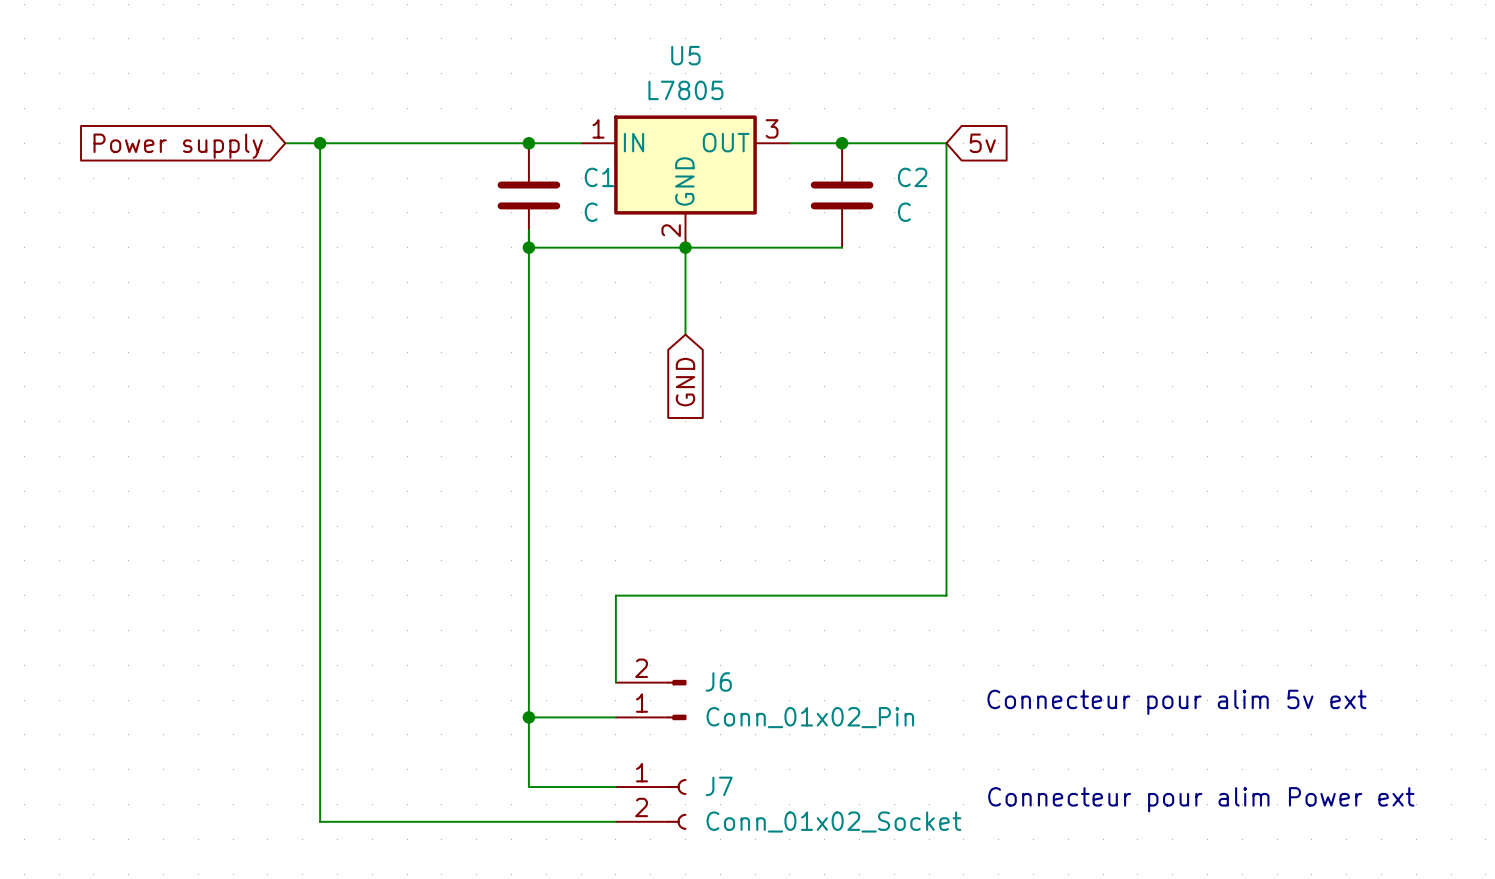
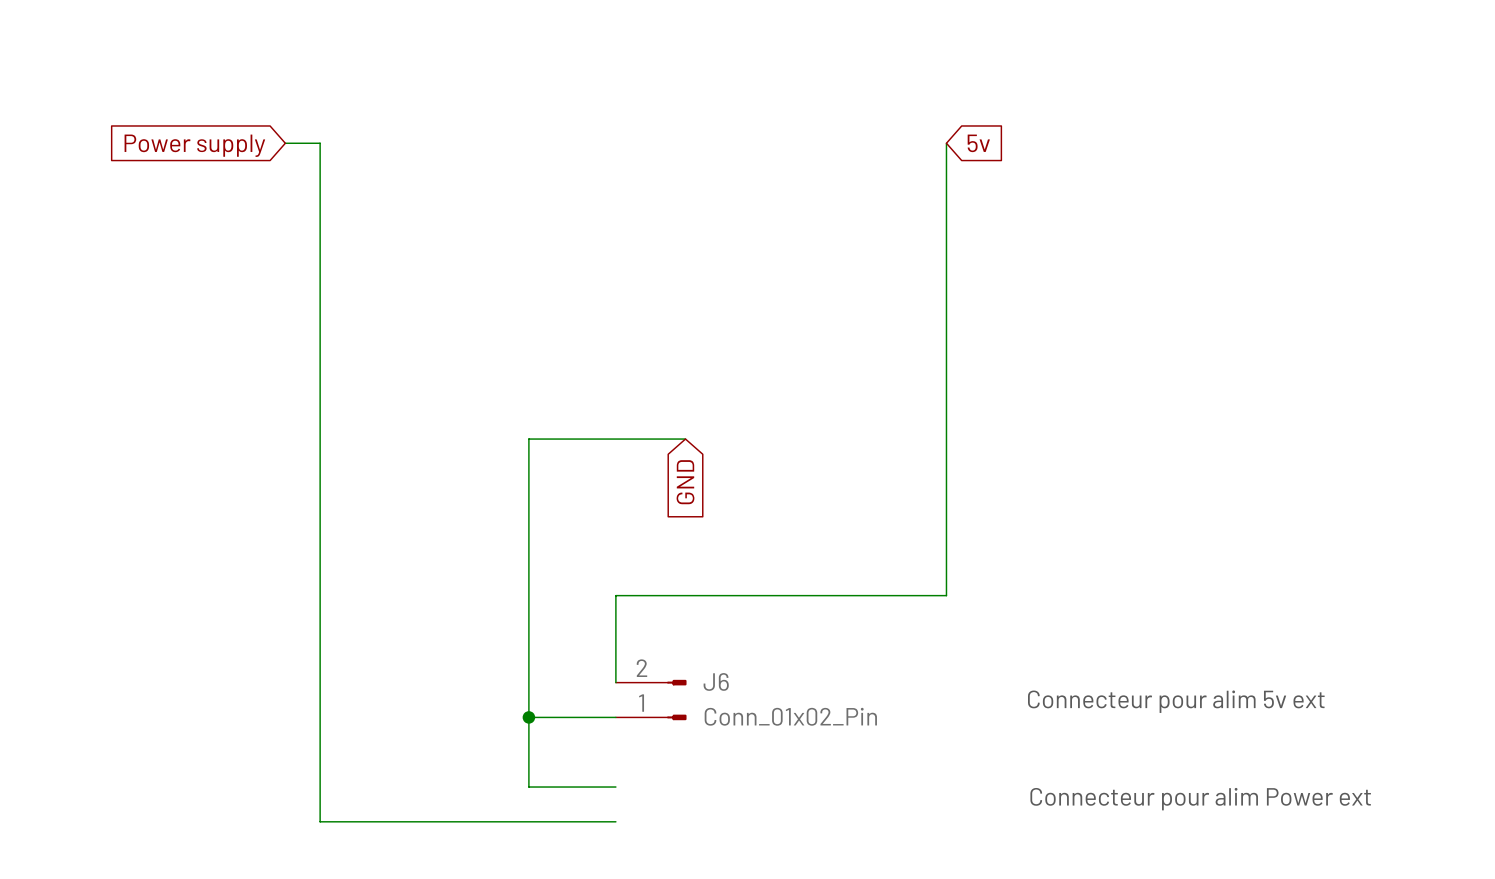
wire: (320, 143) (581, 143) -> none
junction: (320, 143) -> none
junction: (528, 143) -> none
wire: (789, 143) (946, 143) -> none
junction: (842, 143) -> none
U5: L7805 (685, 181) -> none
C1: C (528, 195) -> none
C2: C (842, 195) -> none
wire: (528, 230) (528, 439) -> (685, 439) (528, 439)
wire: (528, 247) (842, 247) -> none
junction: (528, 247) -> none
wire: (685, 247) (685, 334) -> none
junction: (685, 247) -> none
global label position: GND (685, 382) -> GND (685, 482)
J7: Conn_01x02_Socket (651, 804) -> none

